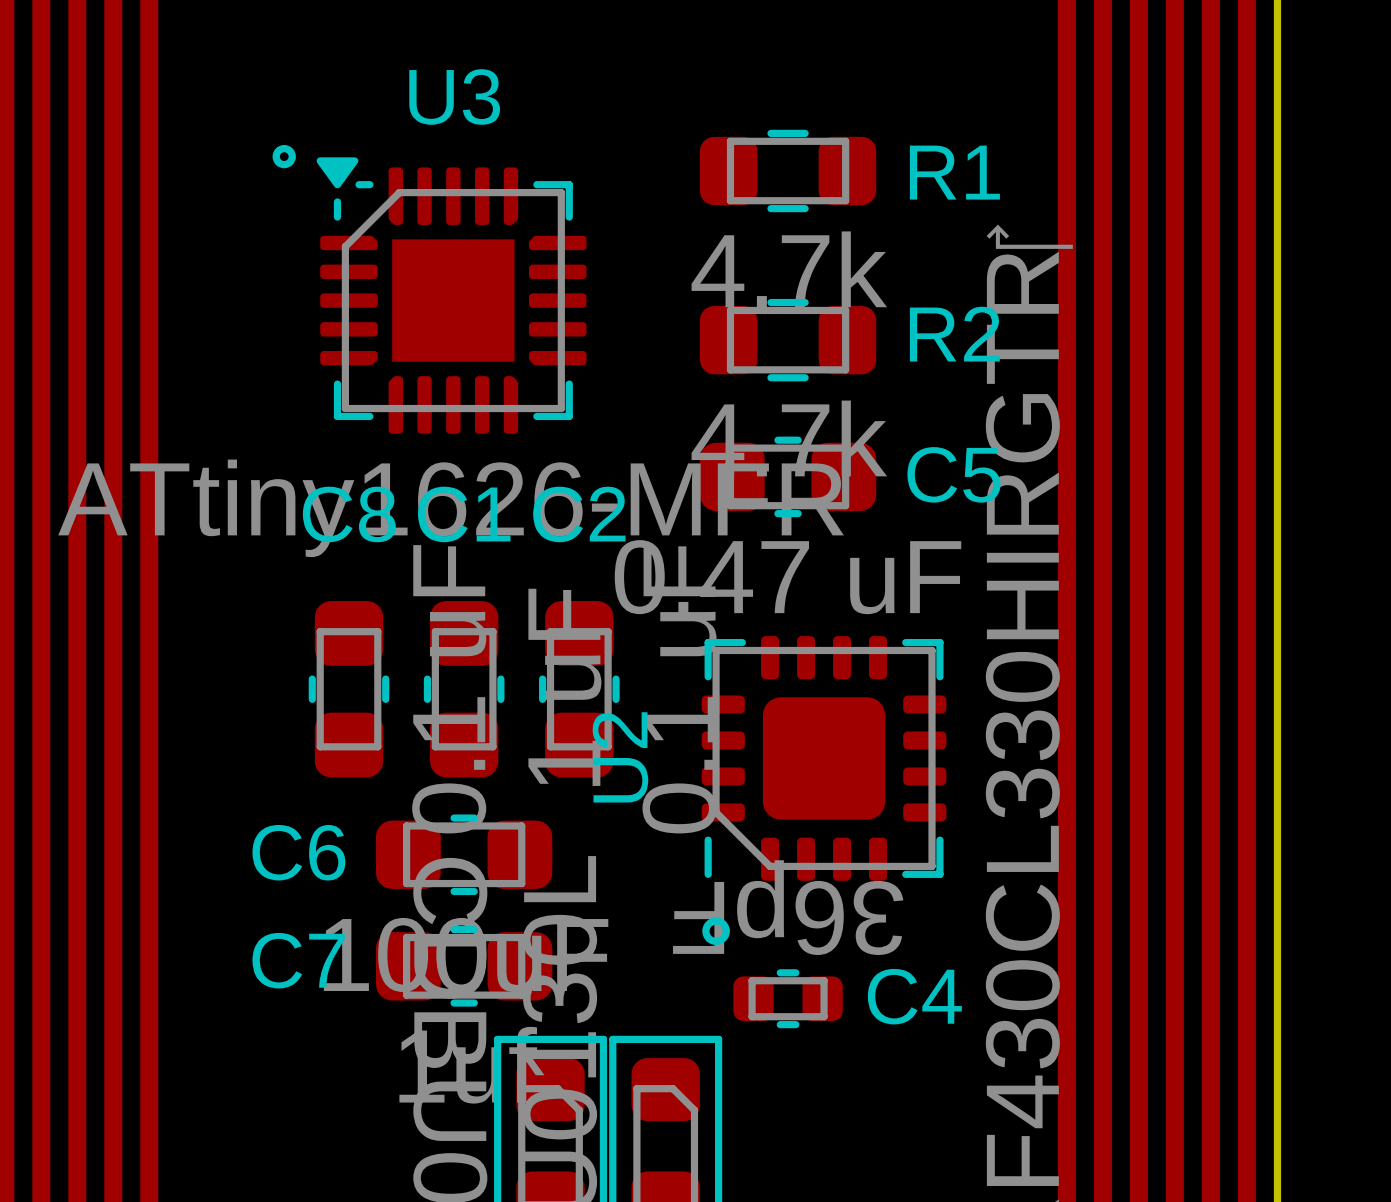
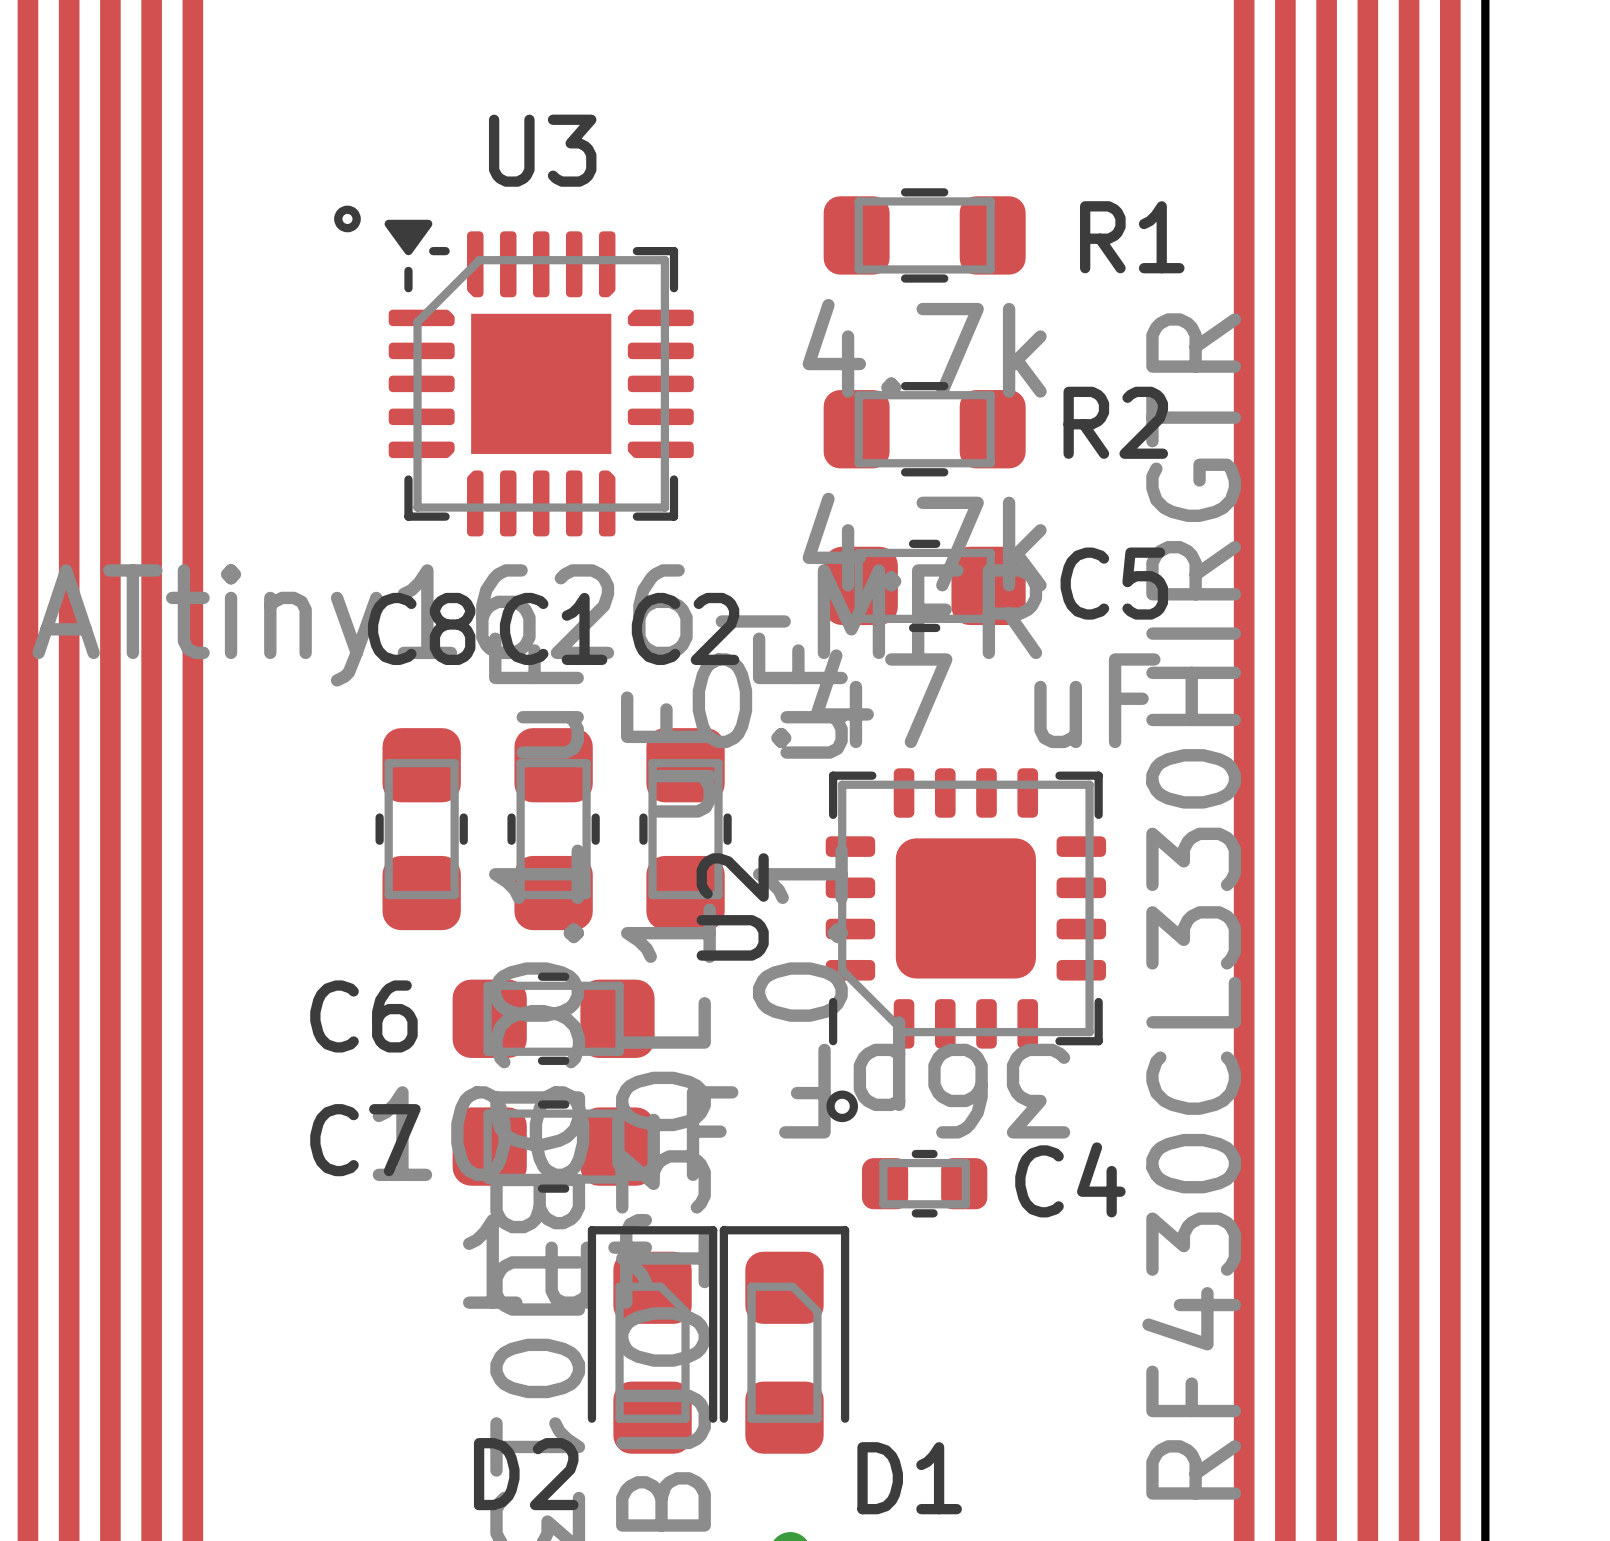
R1 name position: R1 (954, 172) -> R1 (1132, 237)

